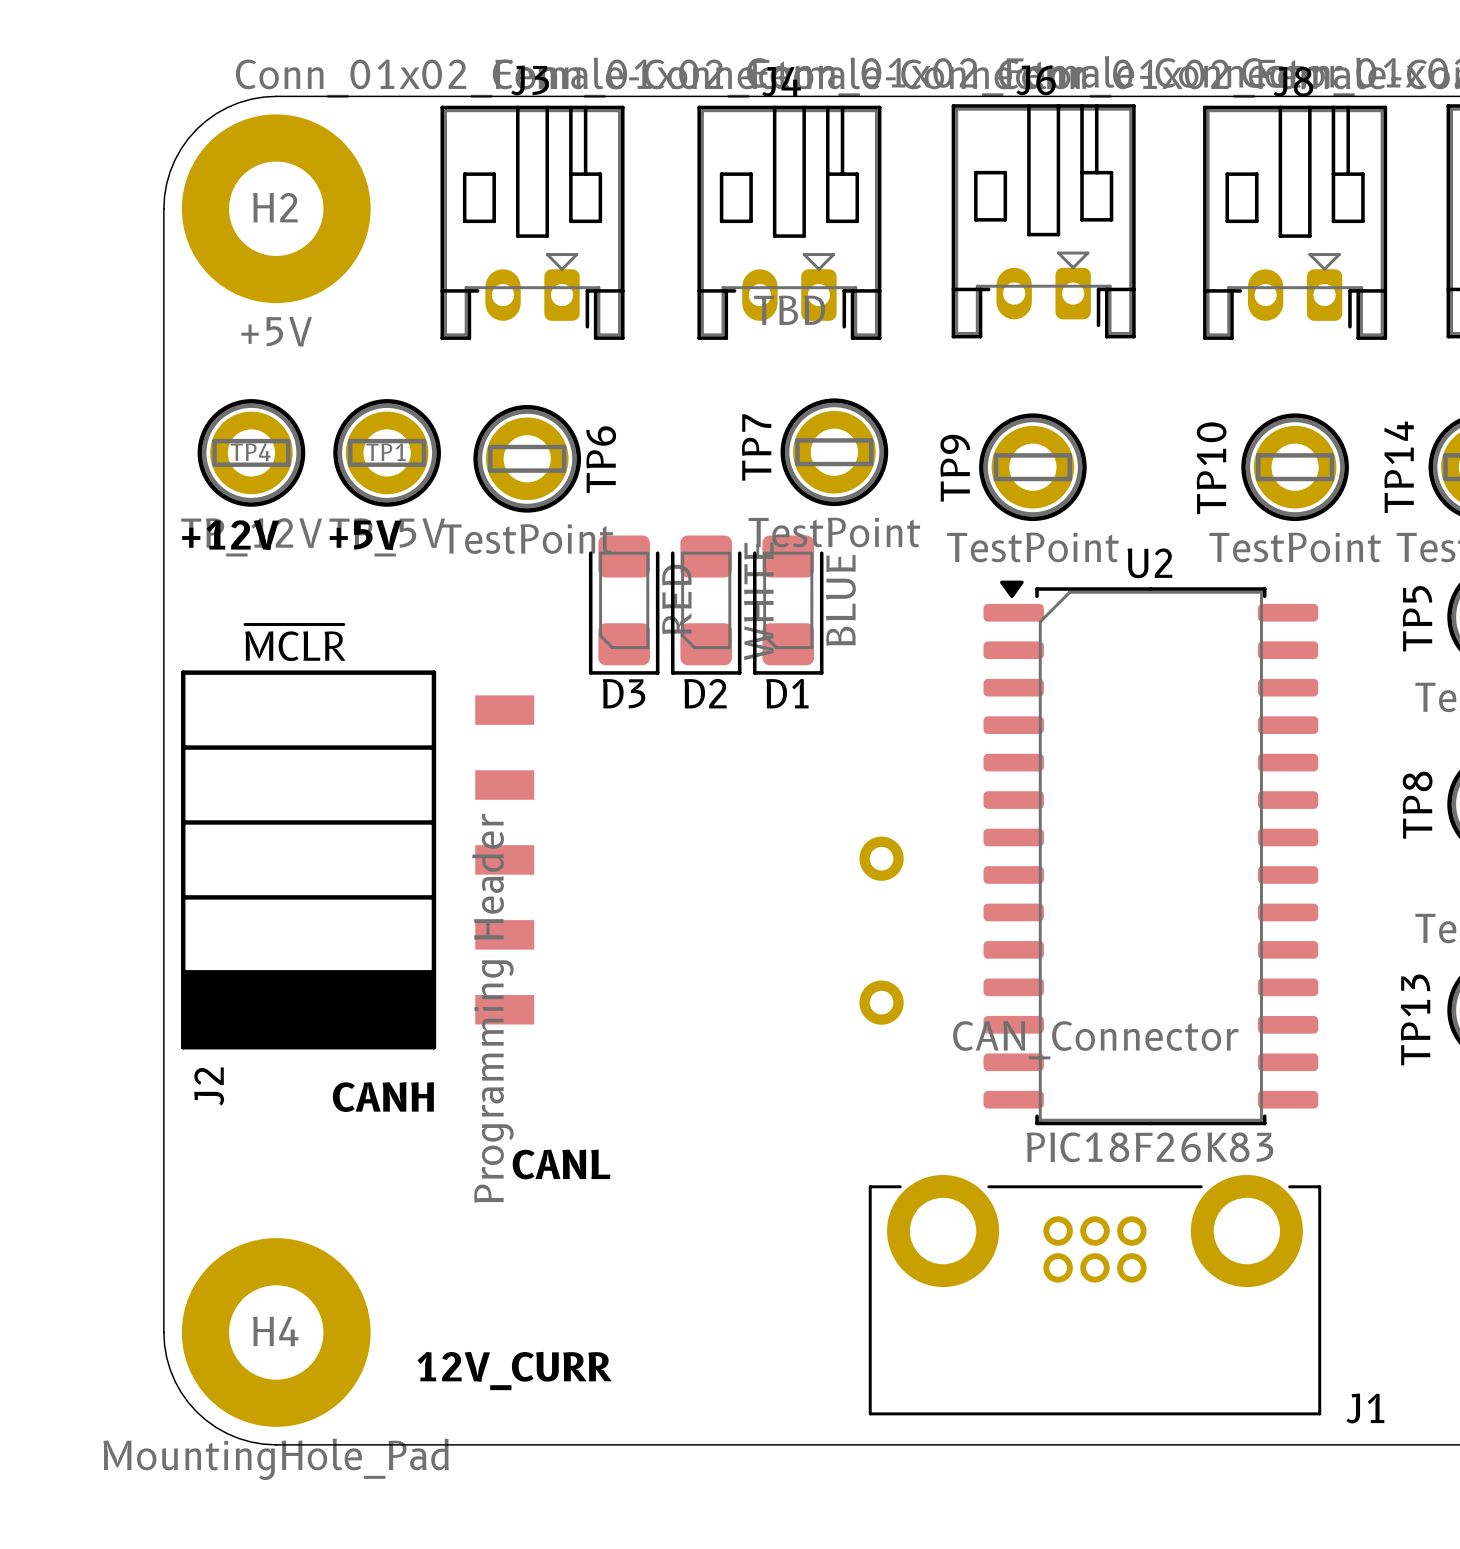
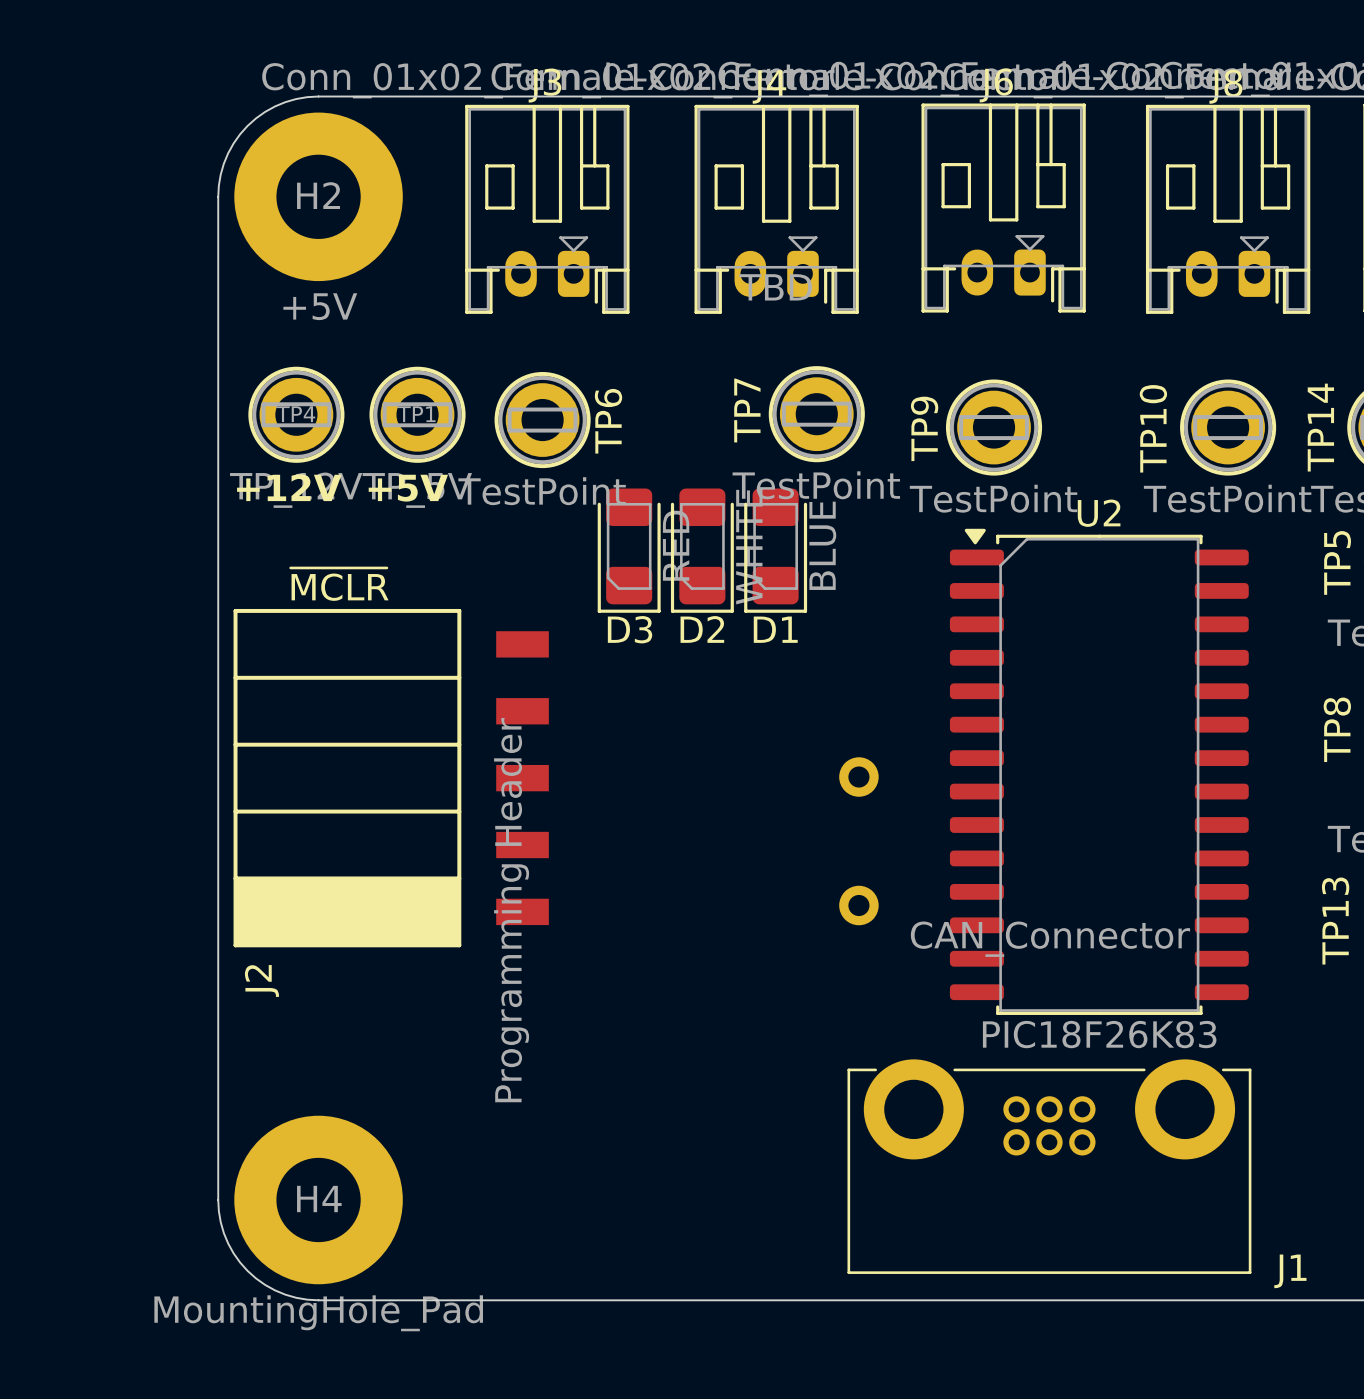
text: CANH (383, 1097) -> none
text: CANL (561, 1164) -> none
text: 12V_CURR (514, 1370) -> none

